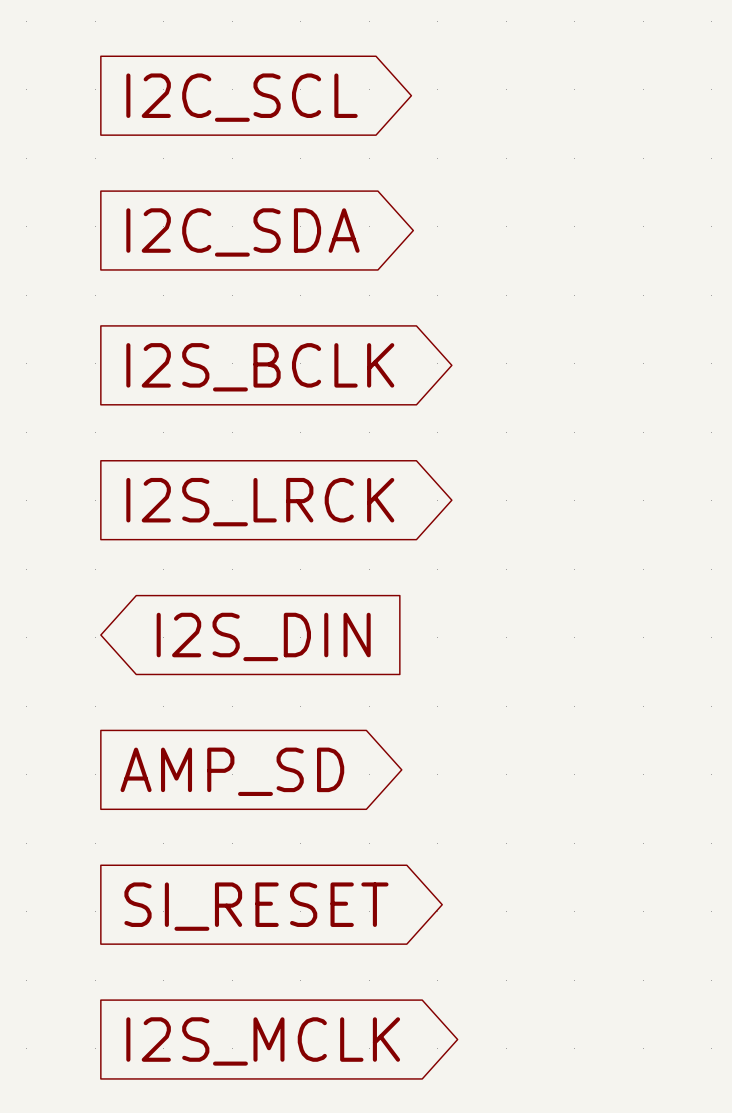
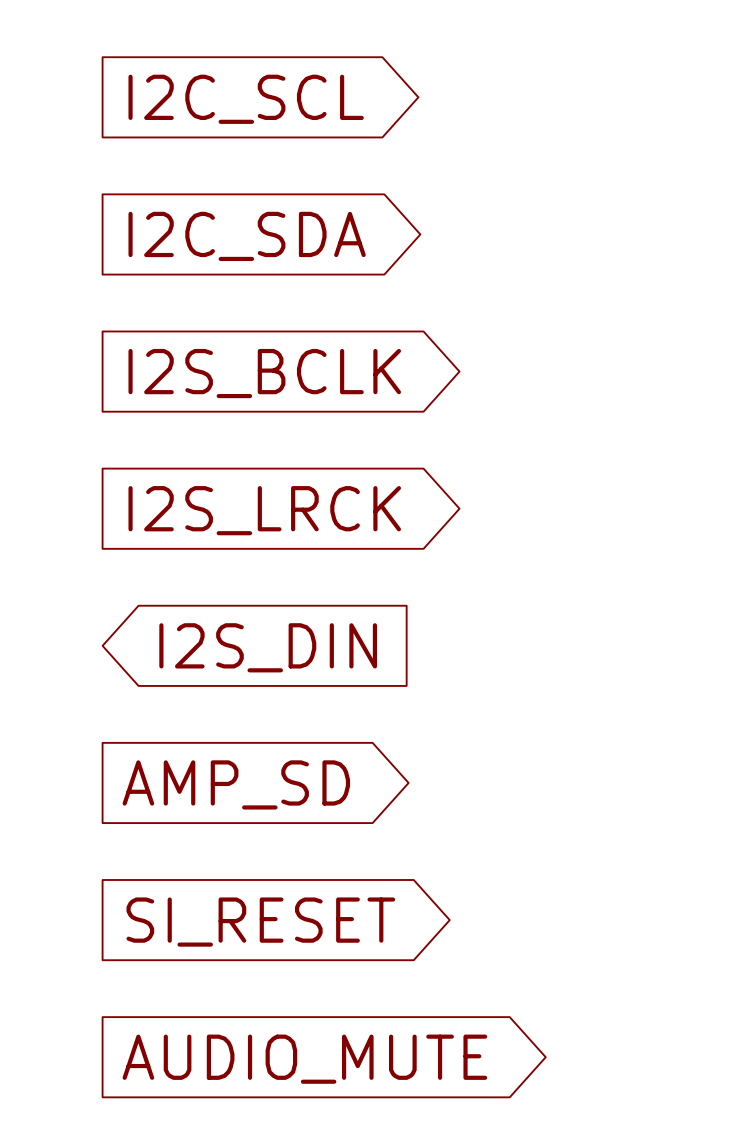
global label: I2S_MCLK (263, 1041) -> AUDIO_MUTE (304, 1059)

